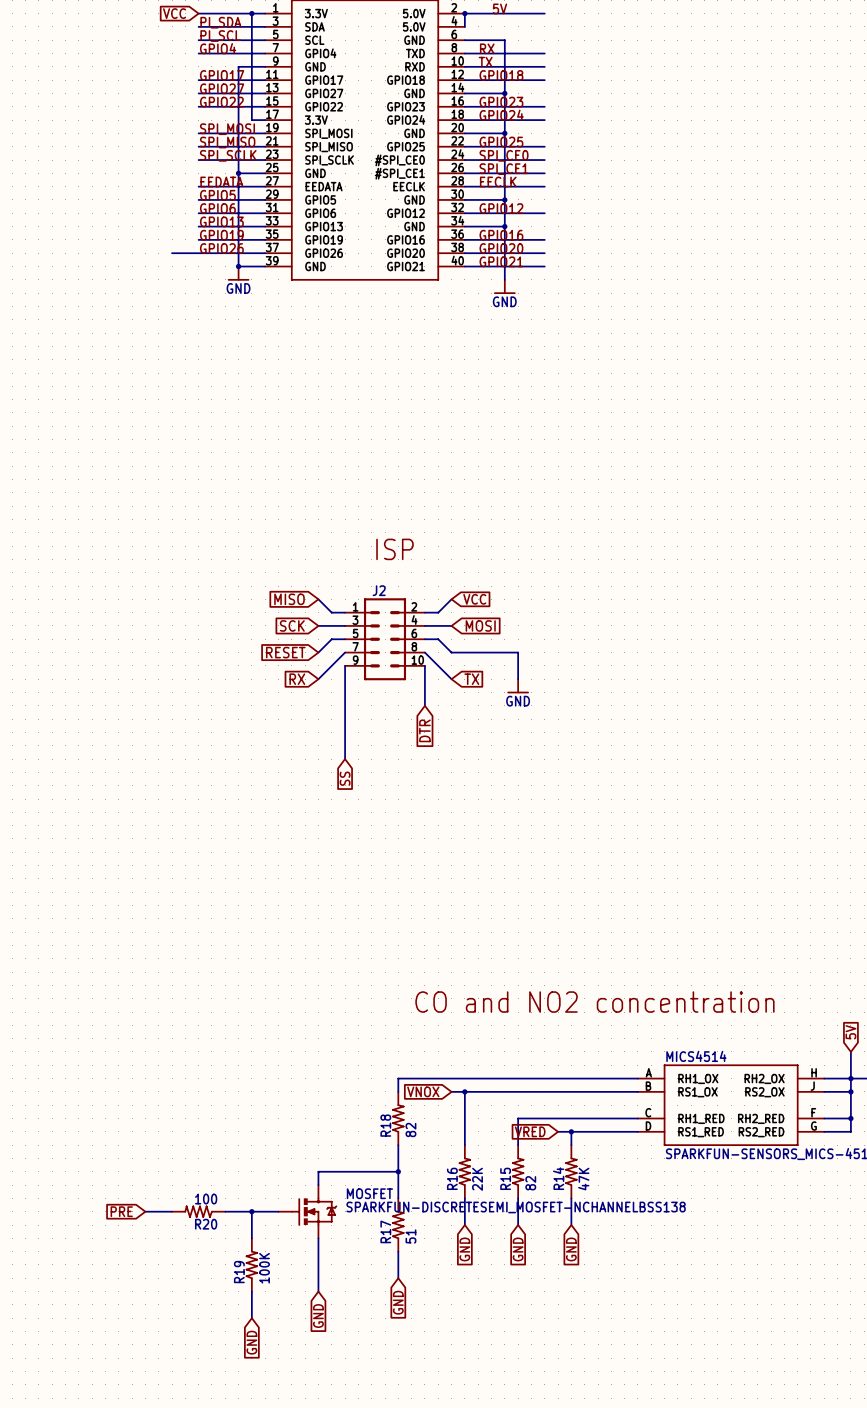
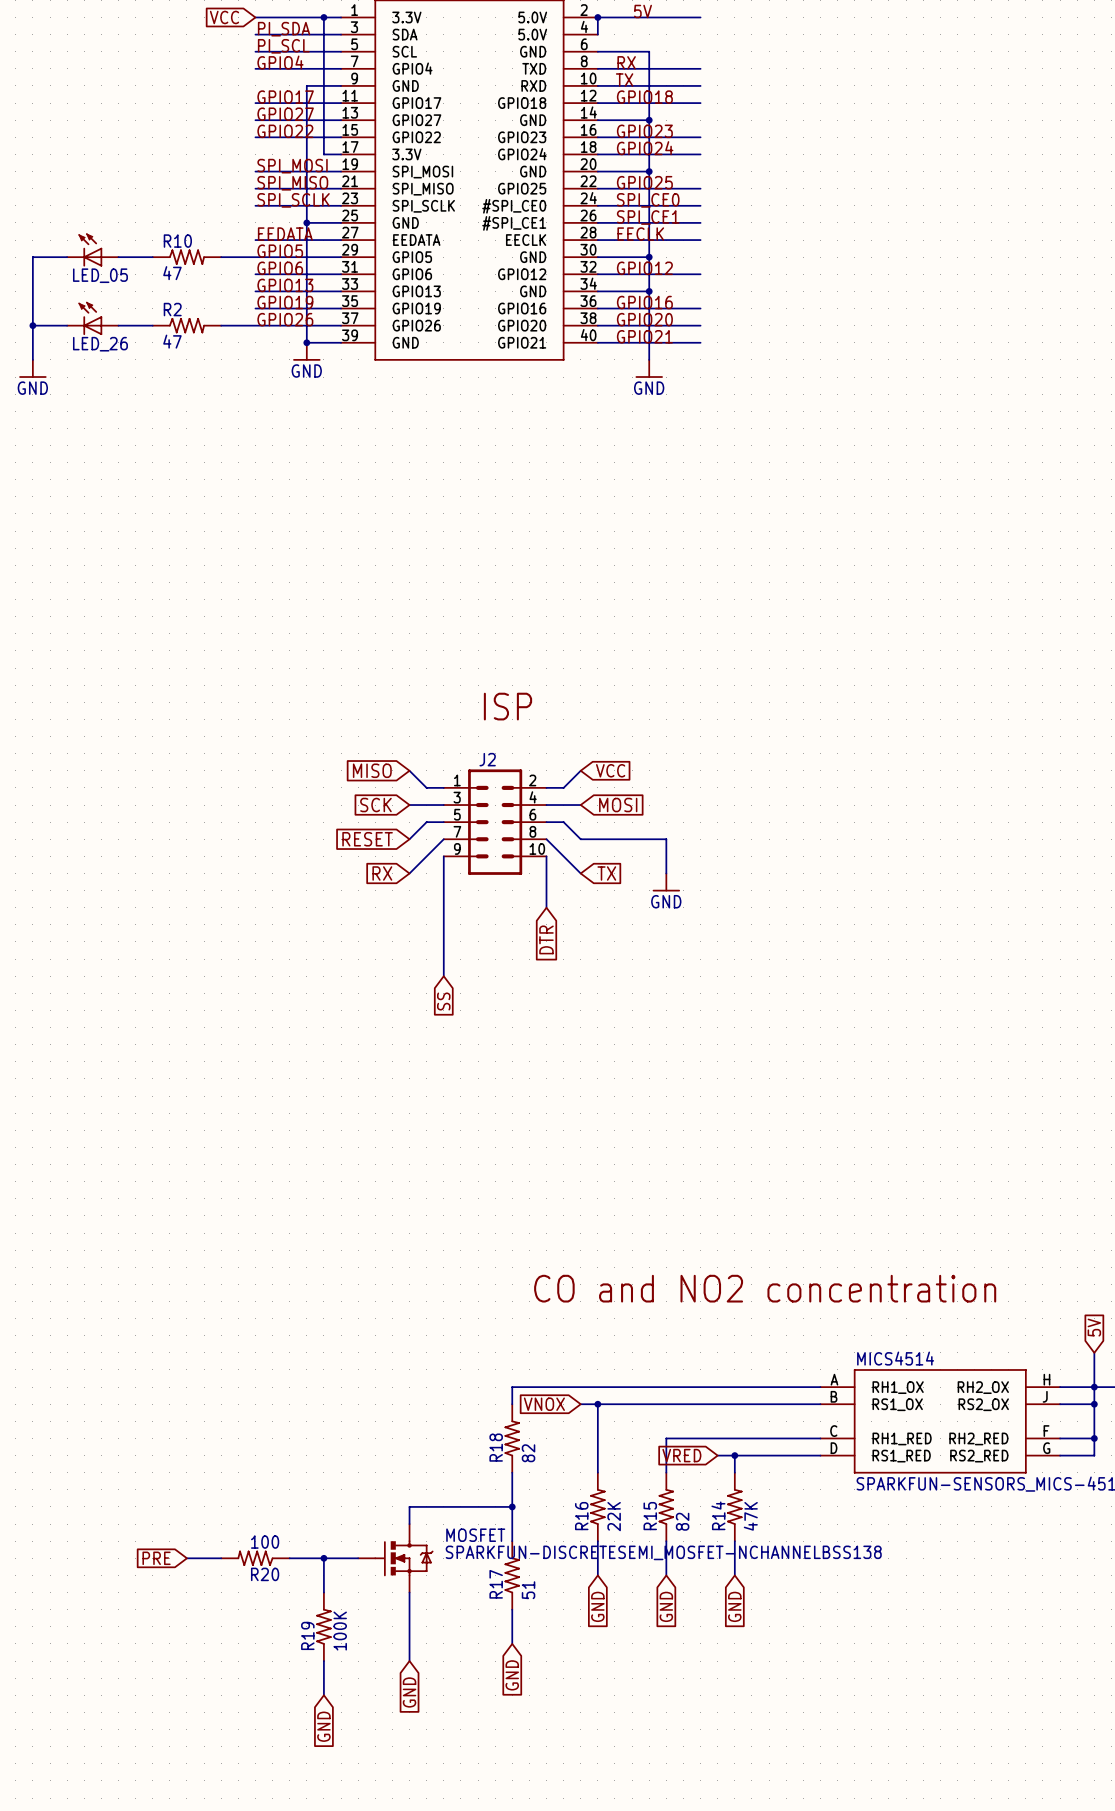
LED_05: none -> (92, 250)
wire: none -> (67, 257) (32, 257) (32, 359)
wire: none -> (118, 257) (152, 257)
R10: none -> 47 (186, 257)
wire: none -> (221, 257) (255, 257)
LED_26: none -> (92, 318)
wire: none -> (32, 325) (67, 325)
junction: none -> (32, 325)
wire: none -> (118, 325) (152, 325)
R2: none -> 47 (186, 325)
power symbol: none -> GND (32, 368)

